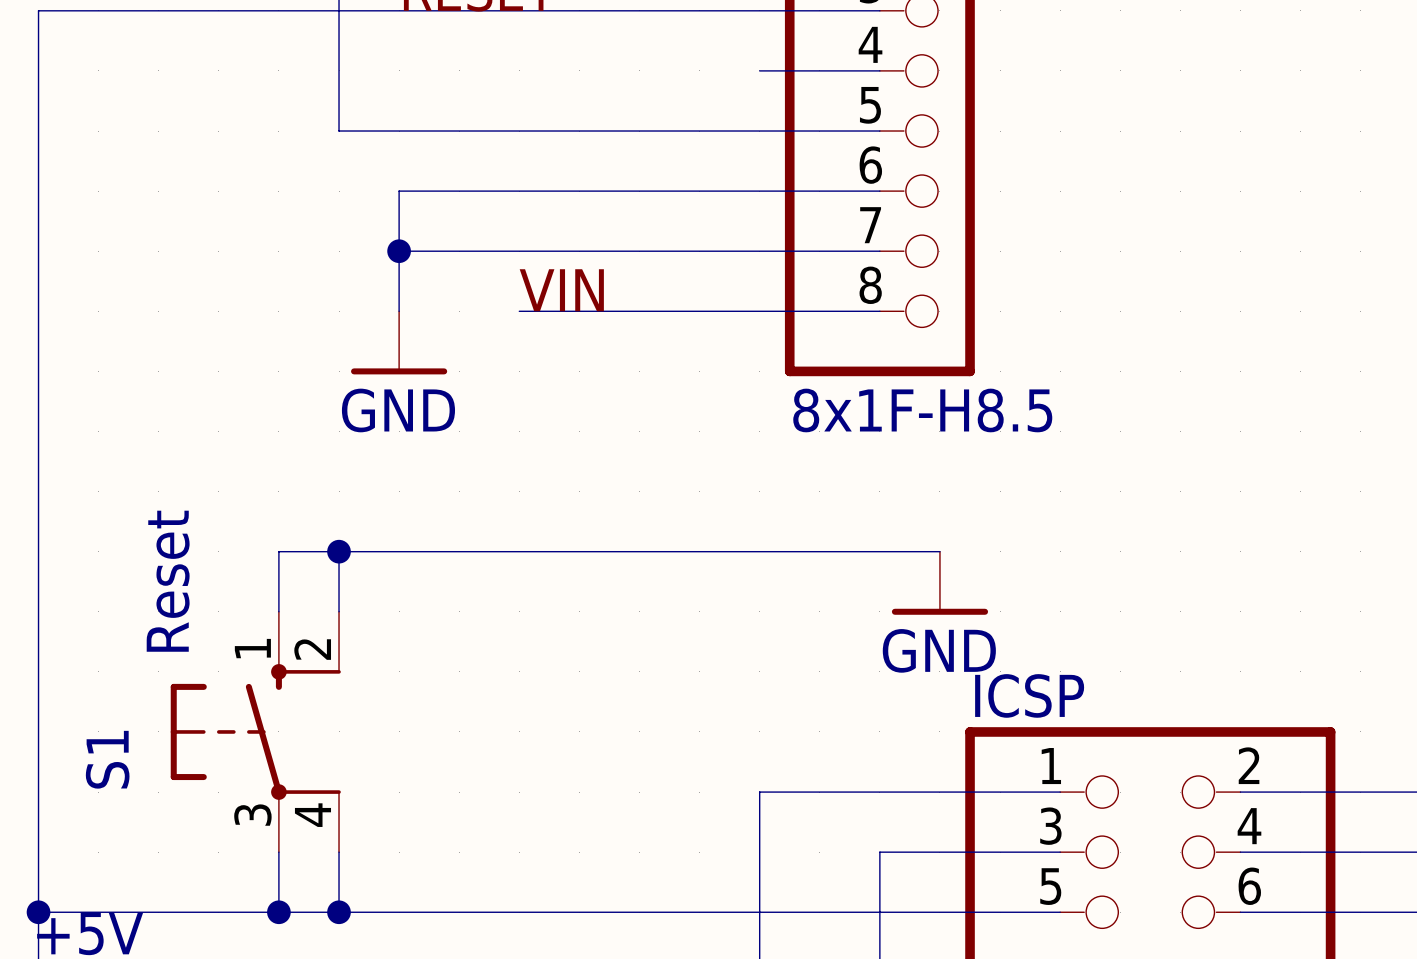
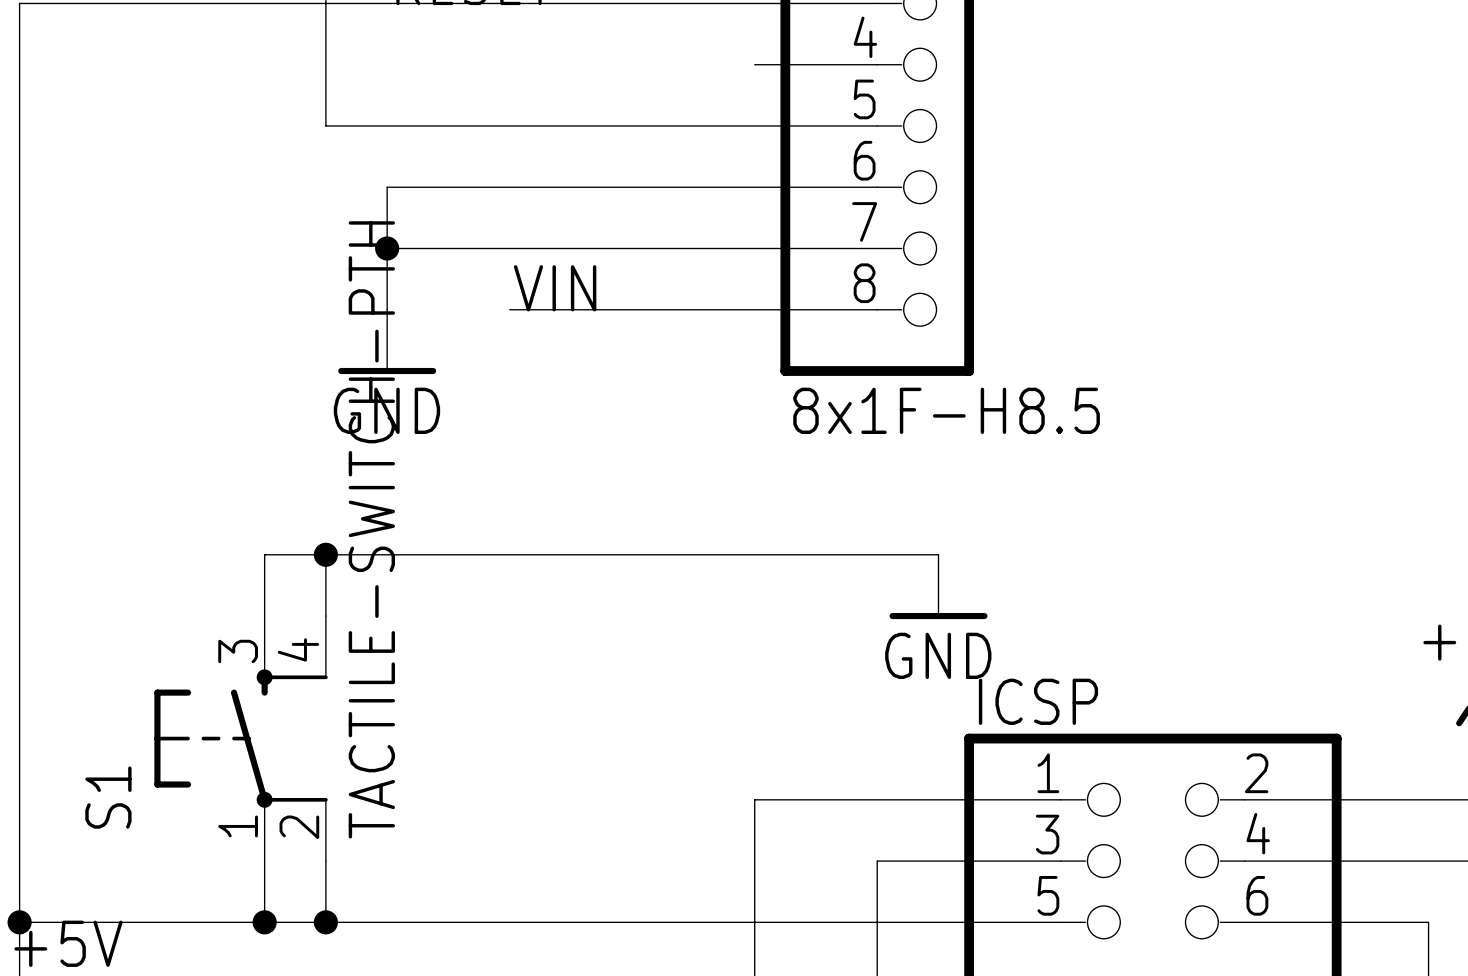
S1 value: Reset (168, 581) -> TACTILE-SWITCH-PTH (371, 529)
S1 pin number: 1 (252, 648) -> 3 (238, 651)
S1 pin number: 2 (312, 649) -> 4 (298, 649)
S1 name position: S1 (107, 759) -> S1 (108, 797)
S1 pin number: 3 (252, 815) -> 1 (238, 826)
S1 pin number: 4 (312, 815) -> 2 (299, 827)

